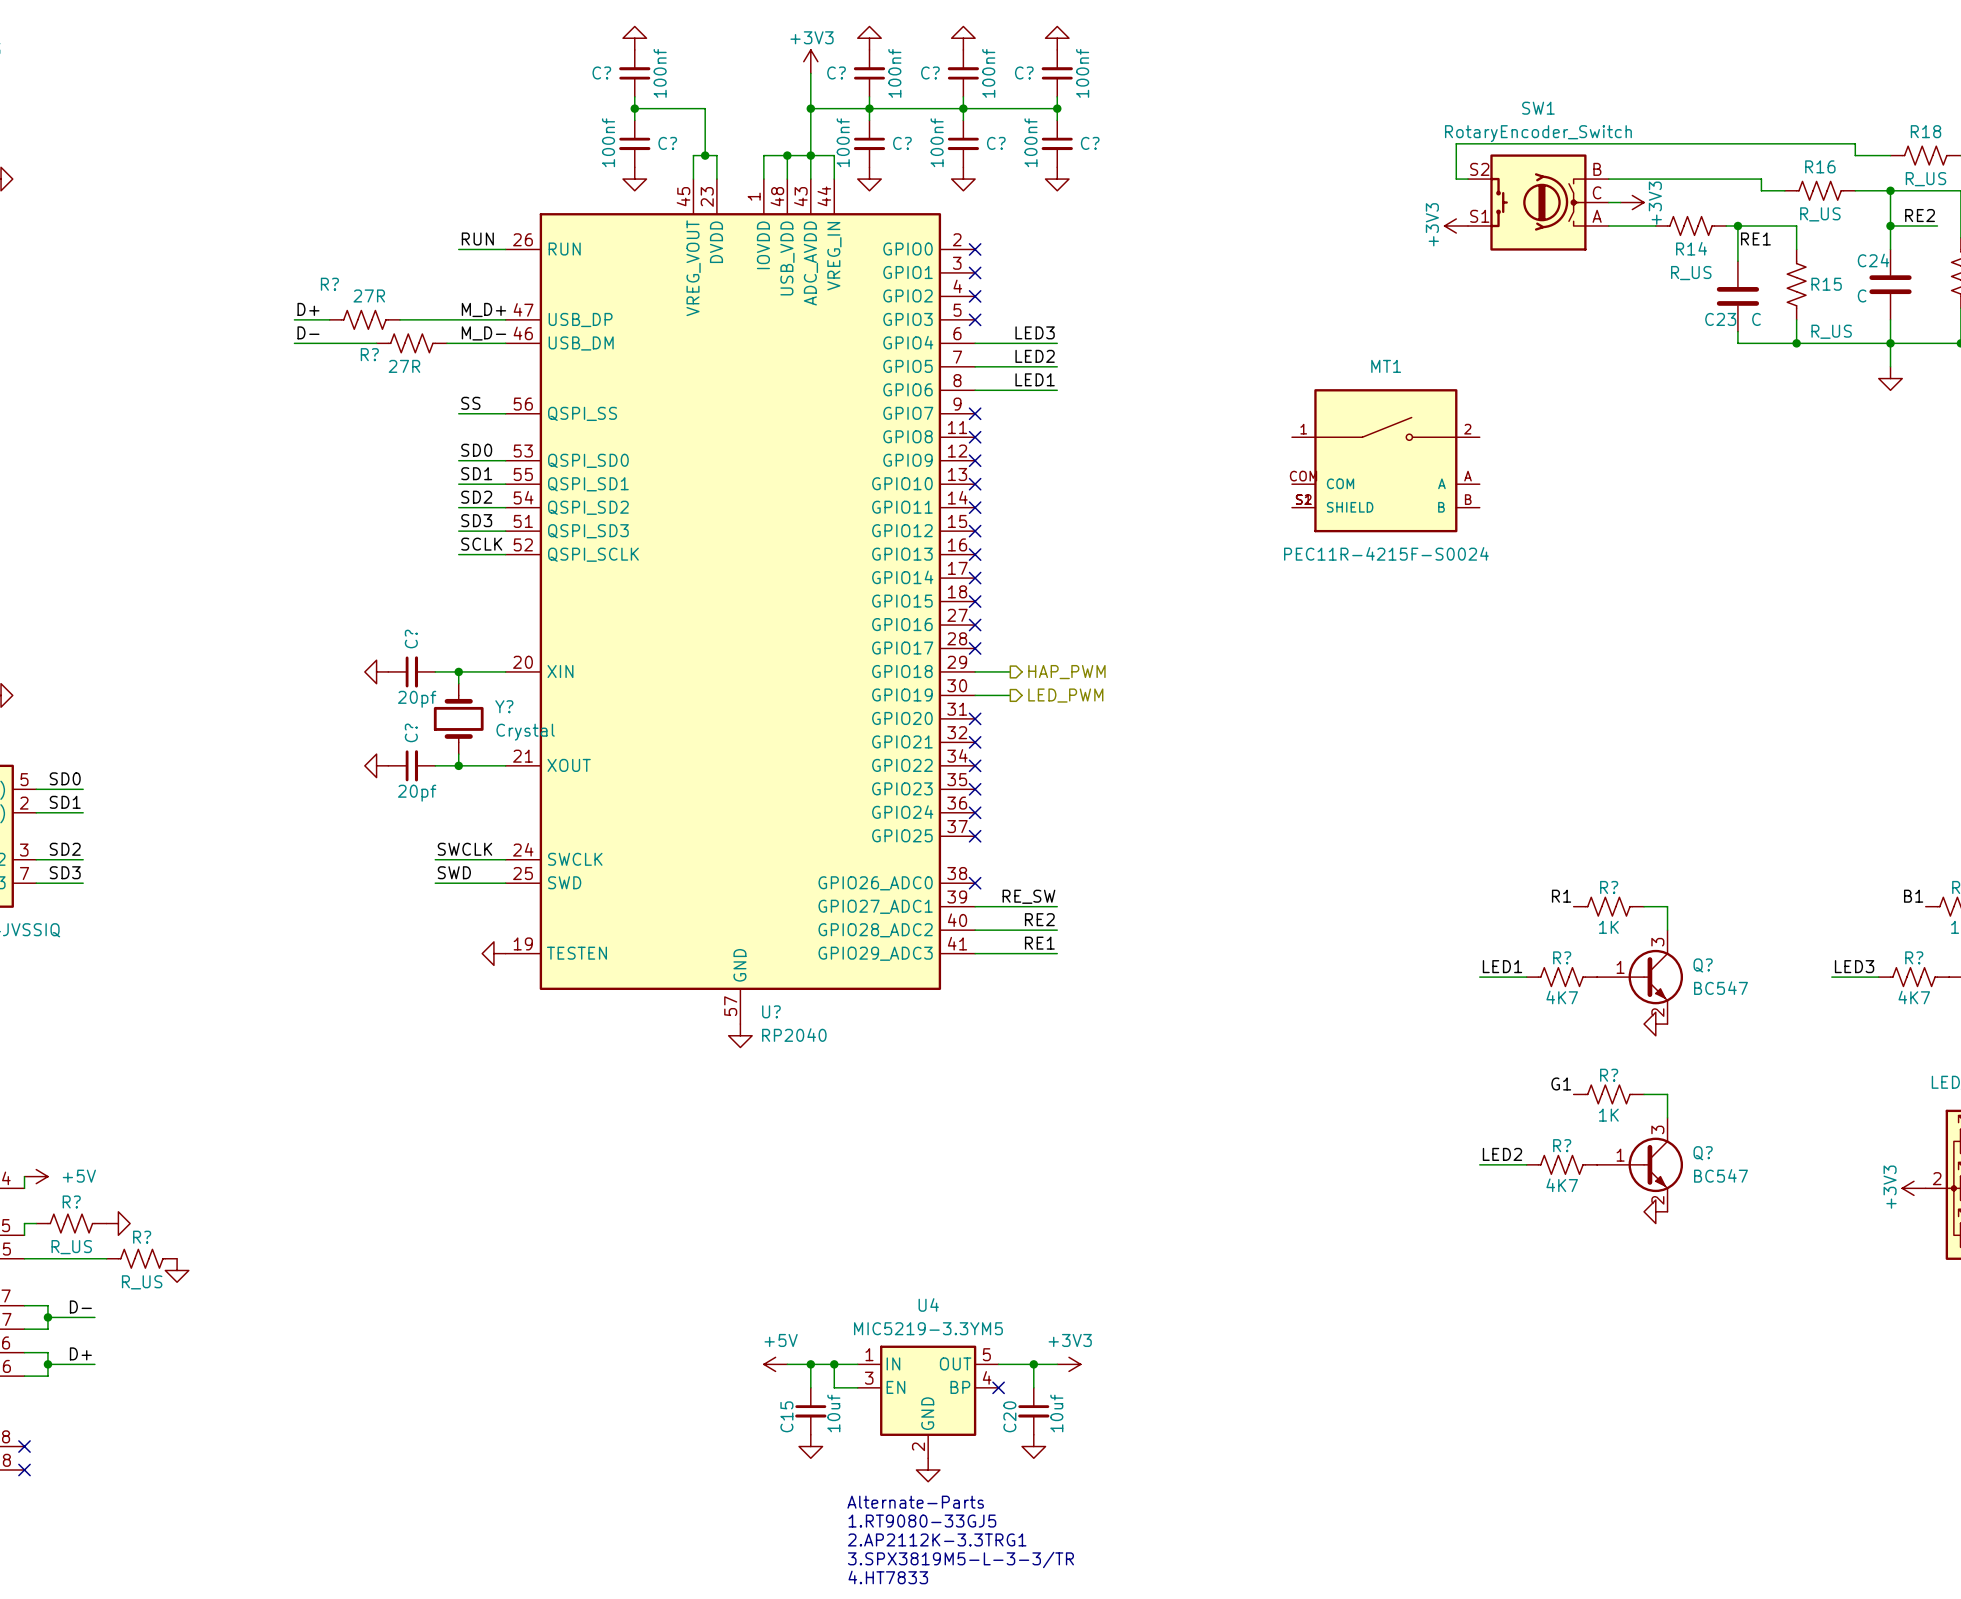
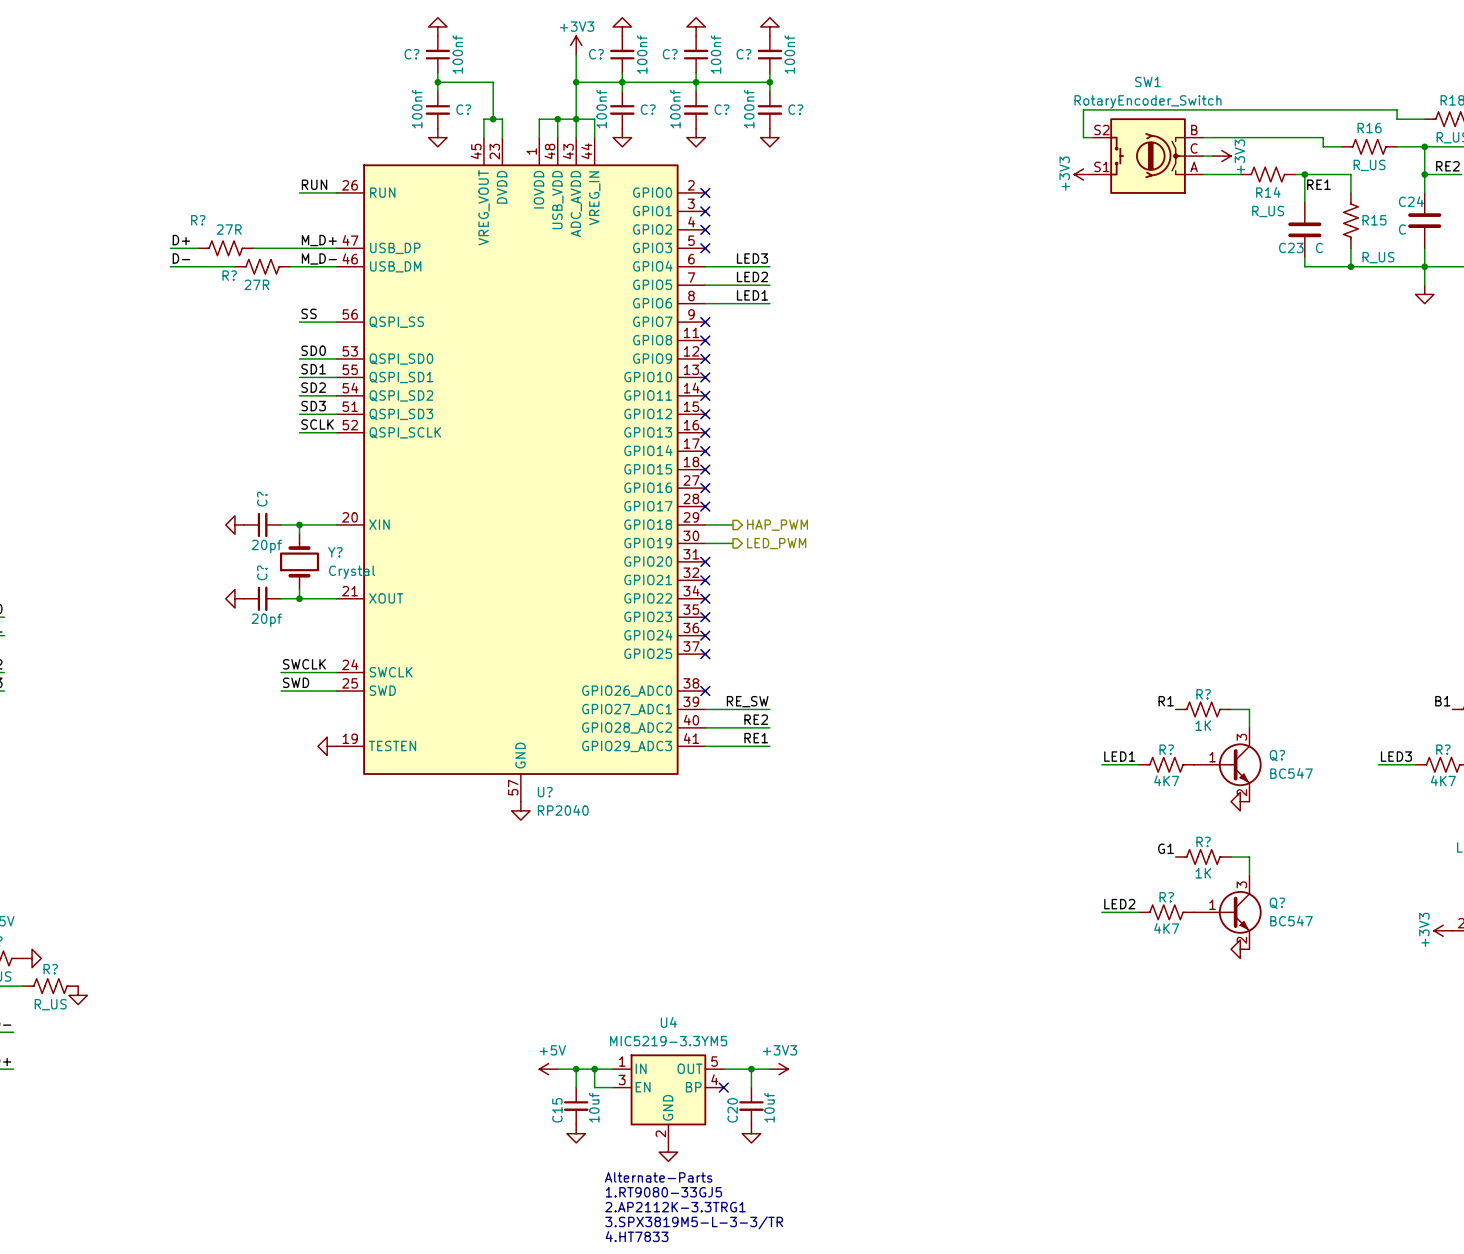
MT1: PEC11R-4215F-S0024 (1385, 460) -> none

